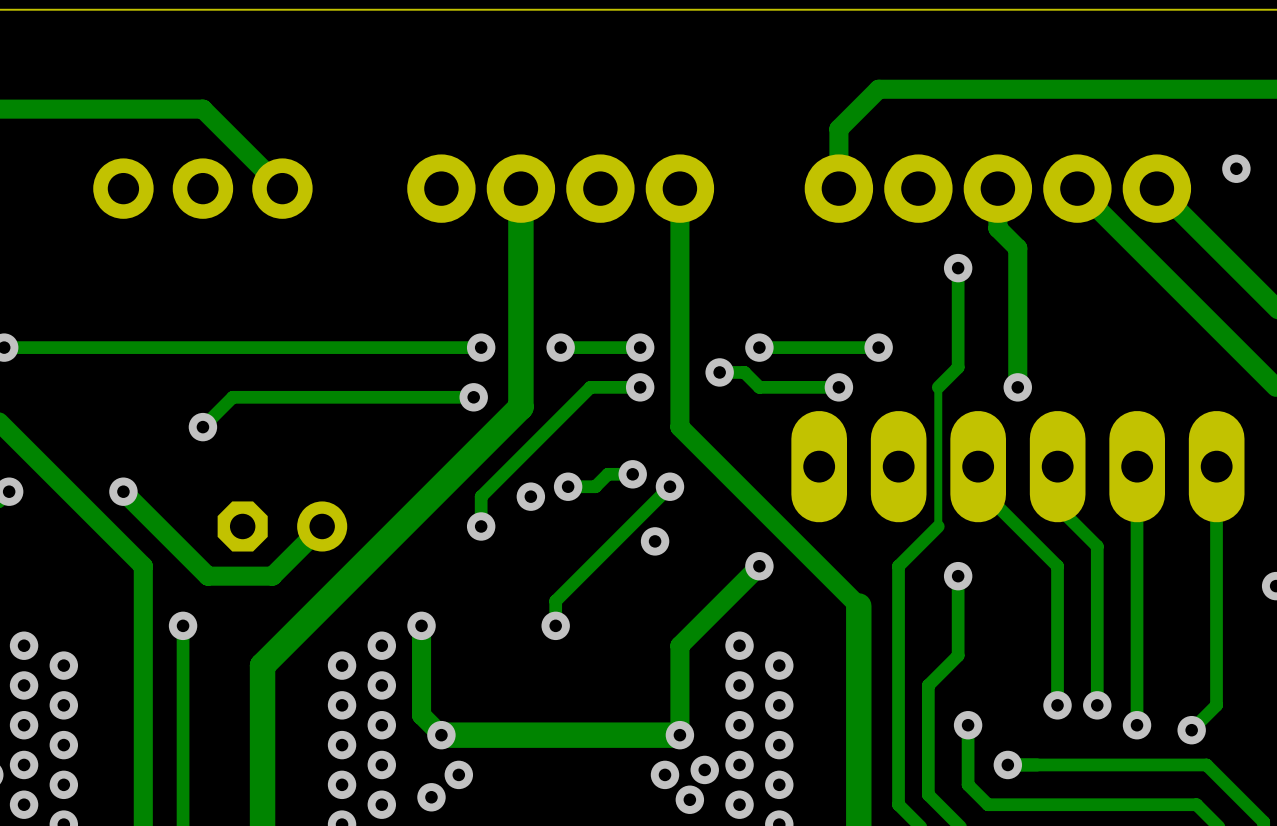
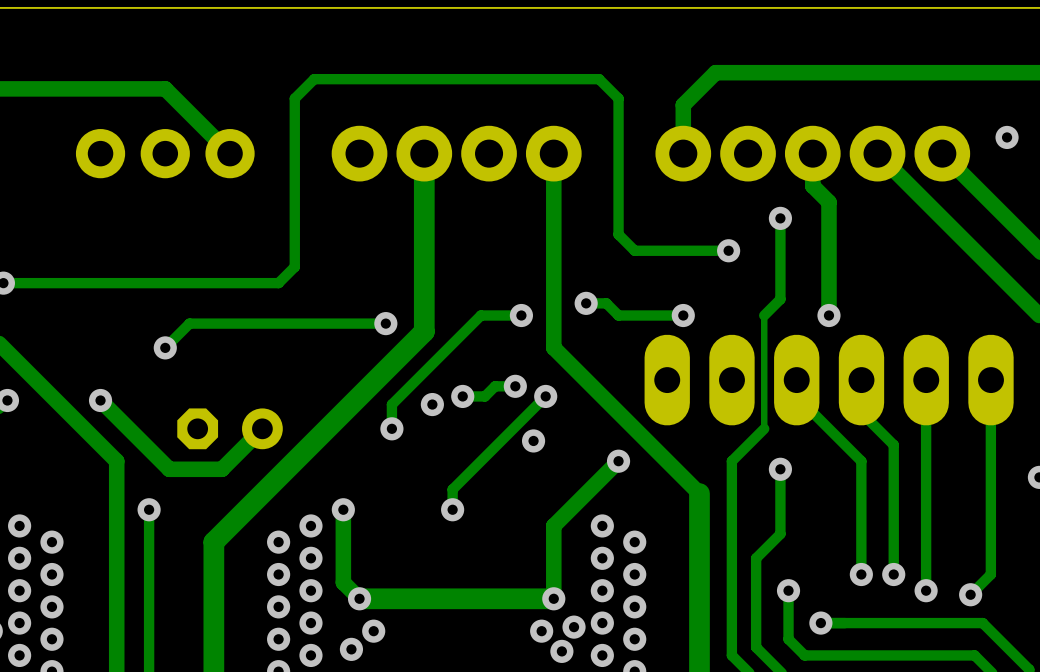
track: (481, 347) (342, 347) -> (728, 250) (634, 250) (618, 234) (618, 98) (599, 79) (314, 79) (294, 98) (294, 266) (278, 283)
via: (481, 347) -> none
via: (560, 347) -> none
track: (640, 347) (560, 347) -> none
via: (640, 347) -> none
via: (759, 347) -> none
track: (878, 347) (759, 347) -> none
via position: (878, 347) -> (728, 250)

